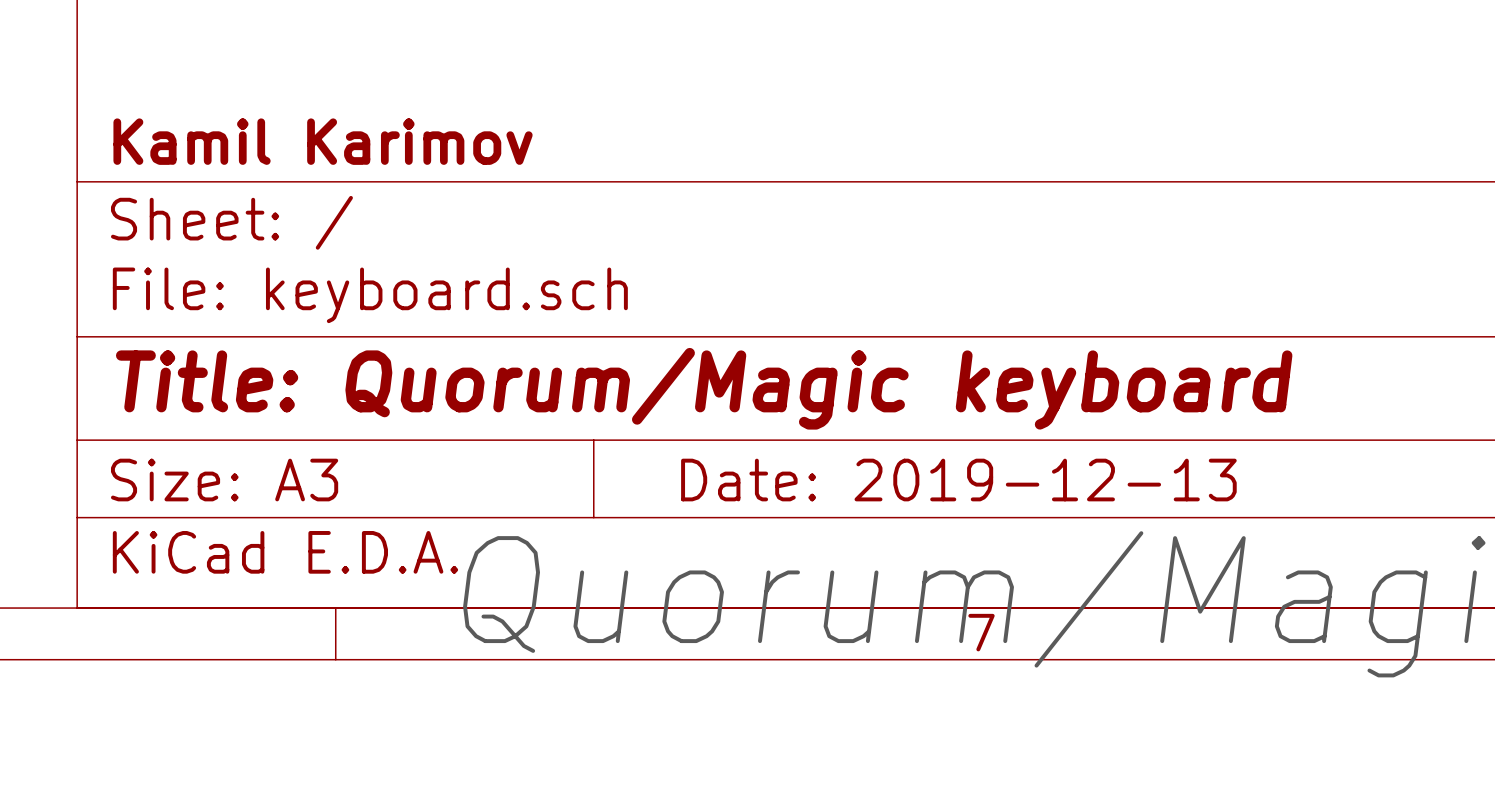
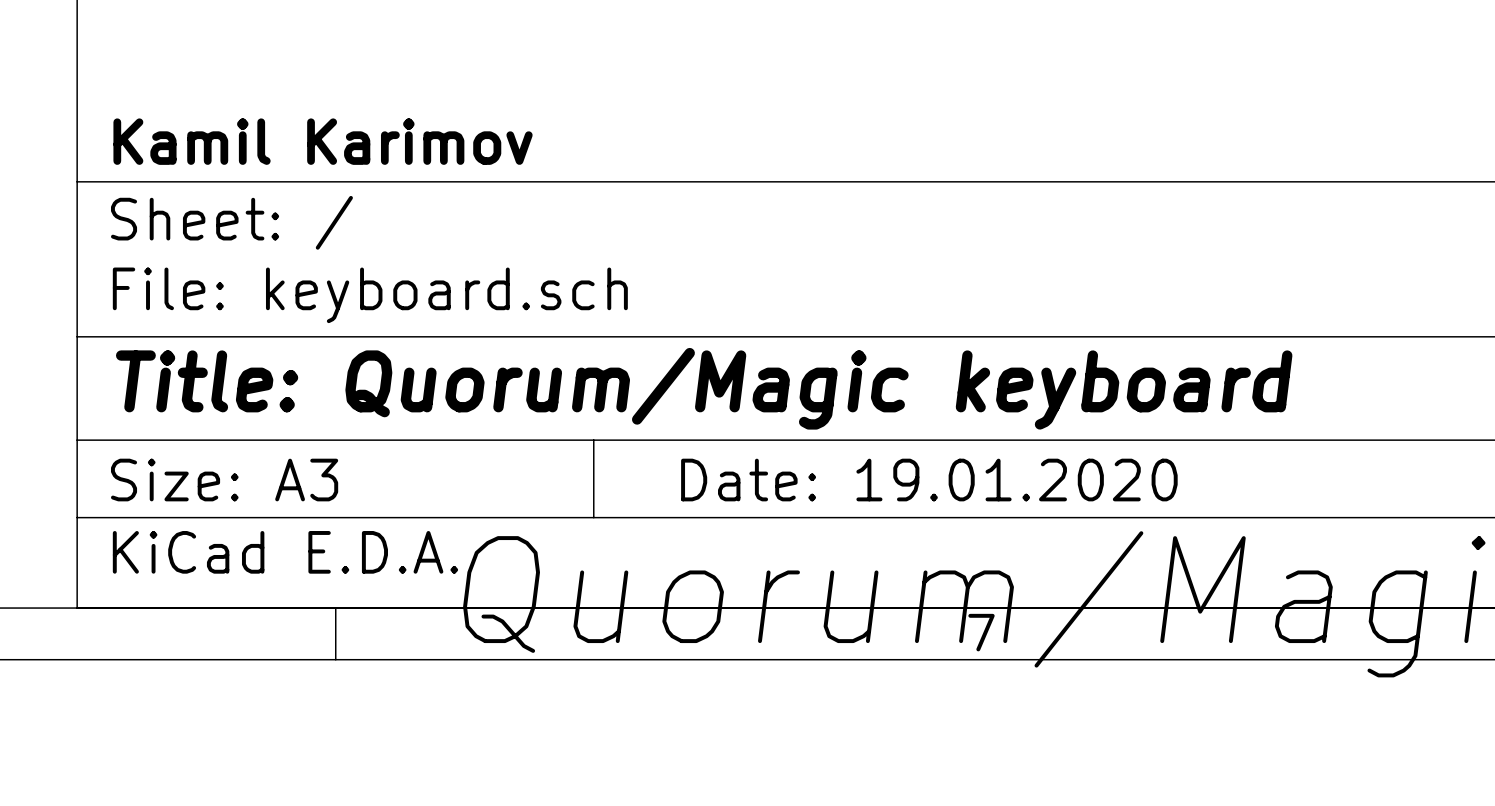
title block: Date: 2019-12-13 (958, 480) -> Date: 19.01.2020 (929, 480)

